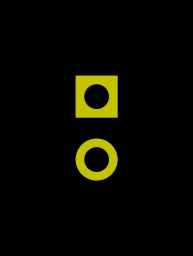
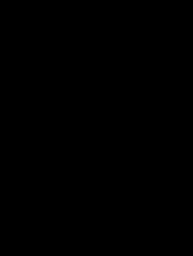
part: (96, 128) -> none

